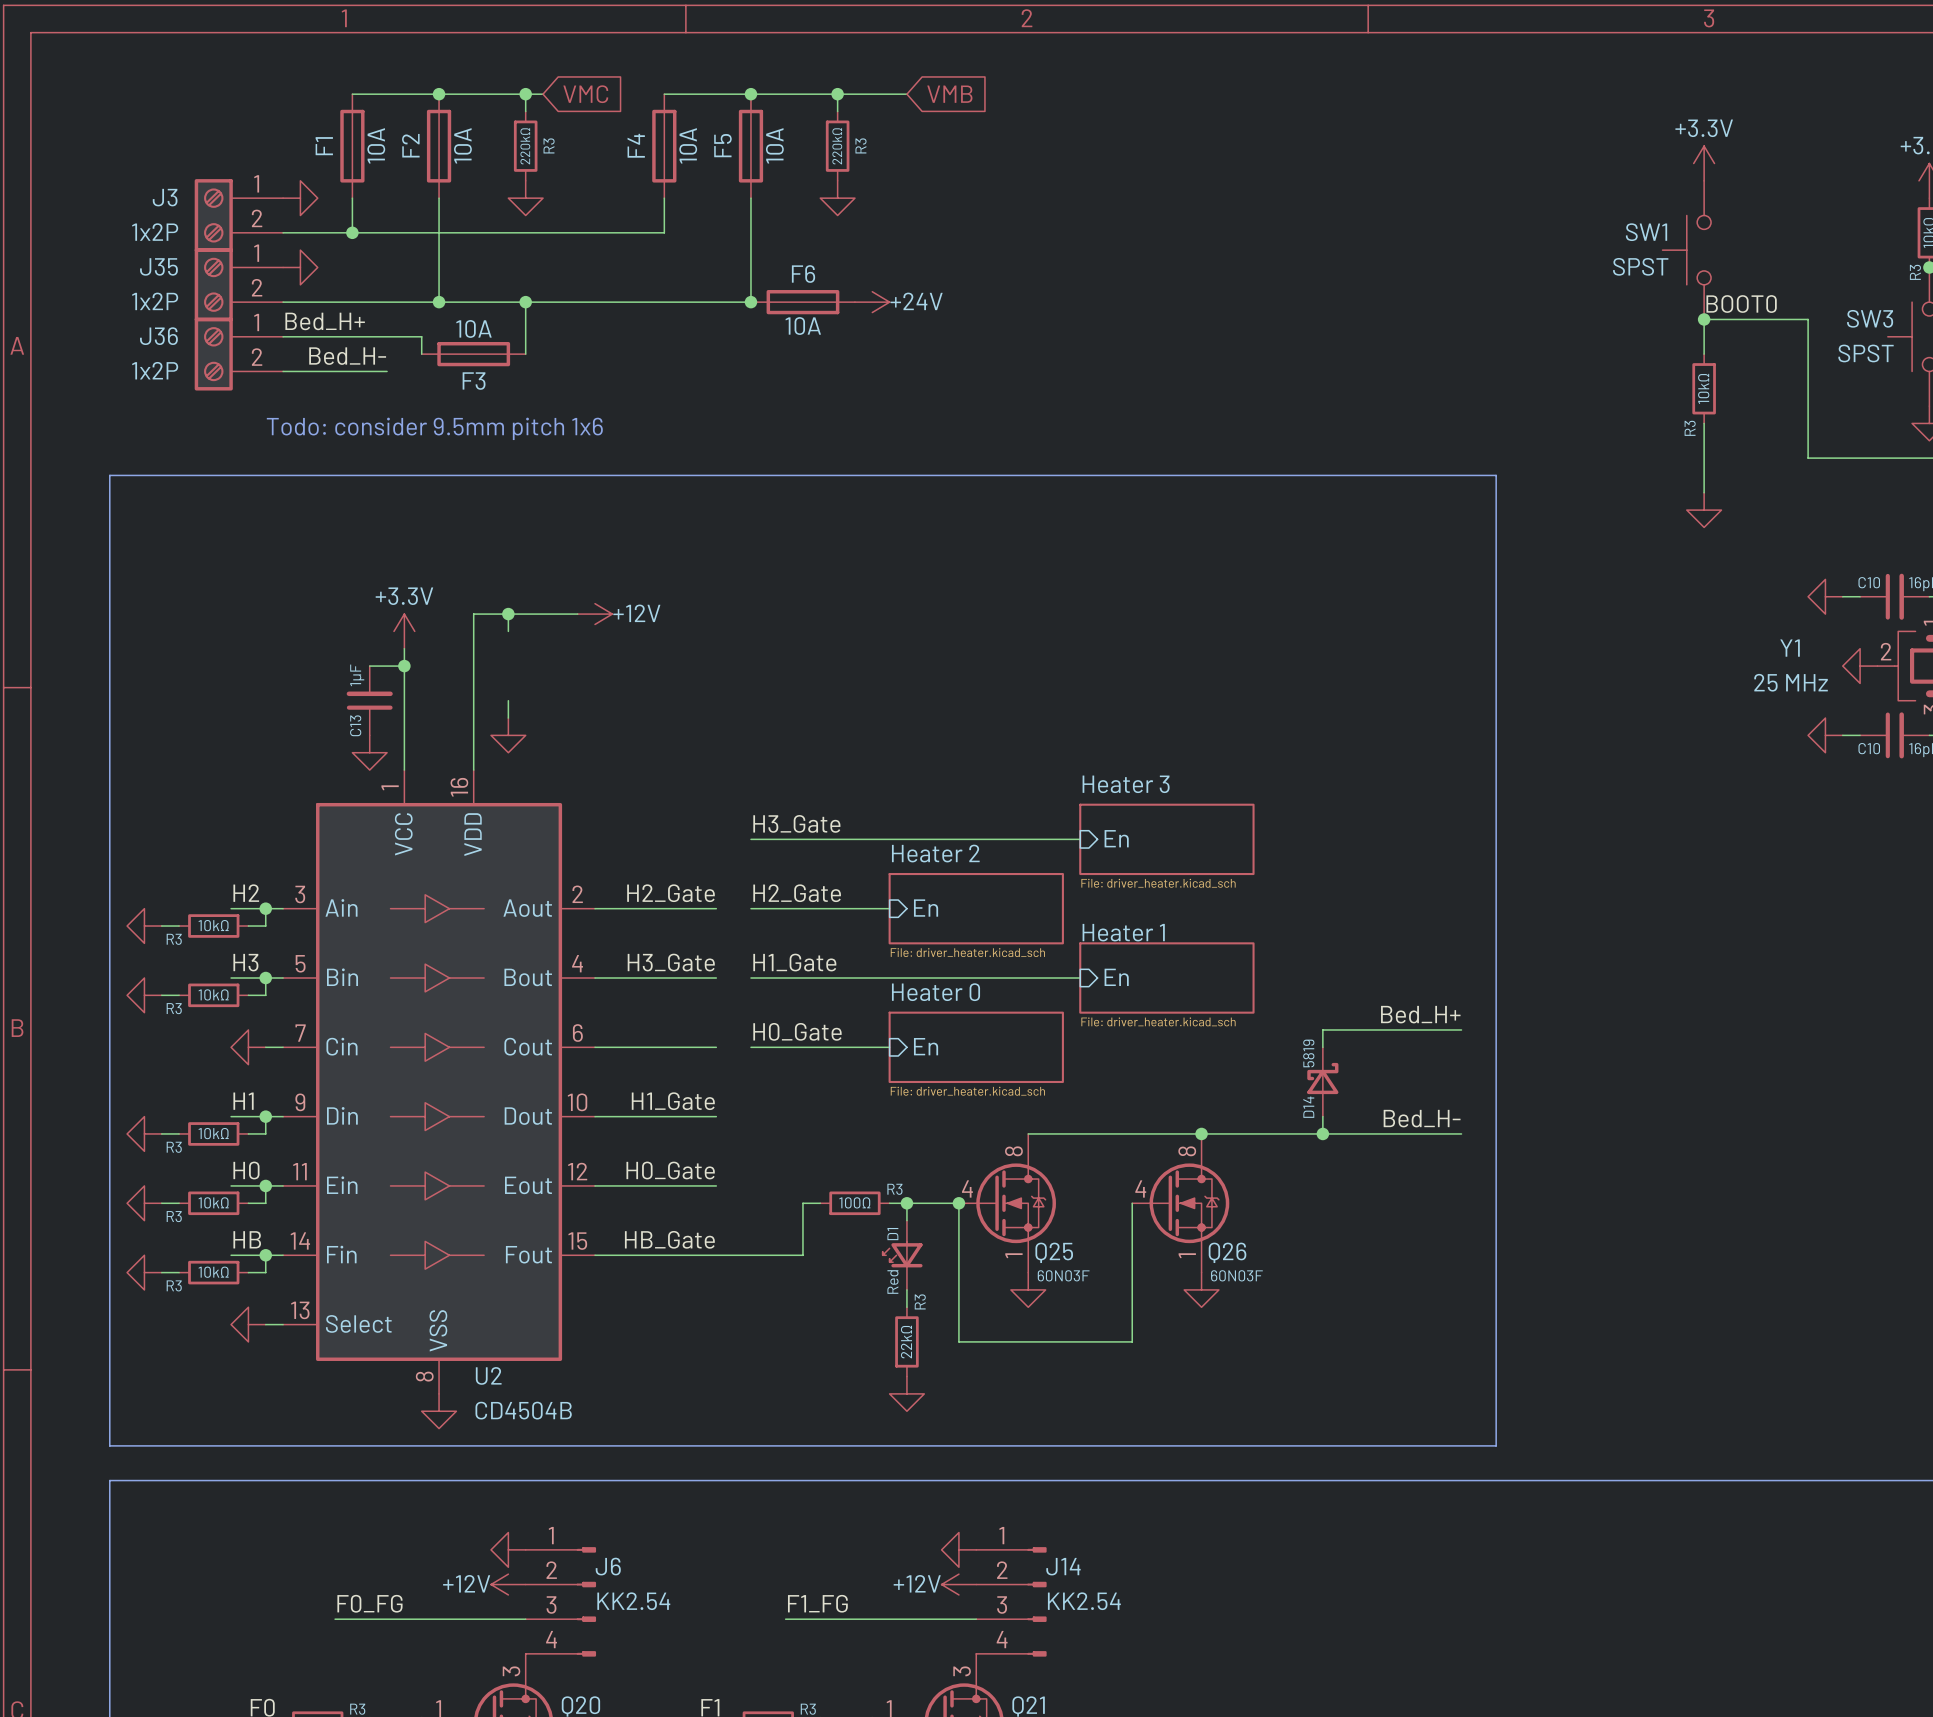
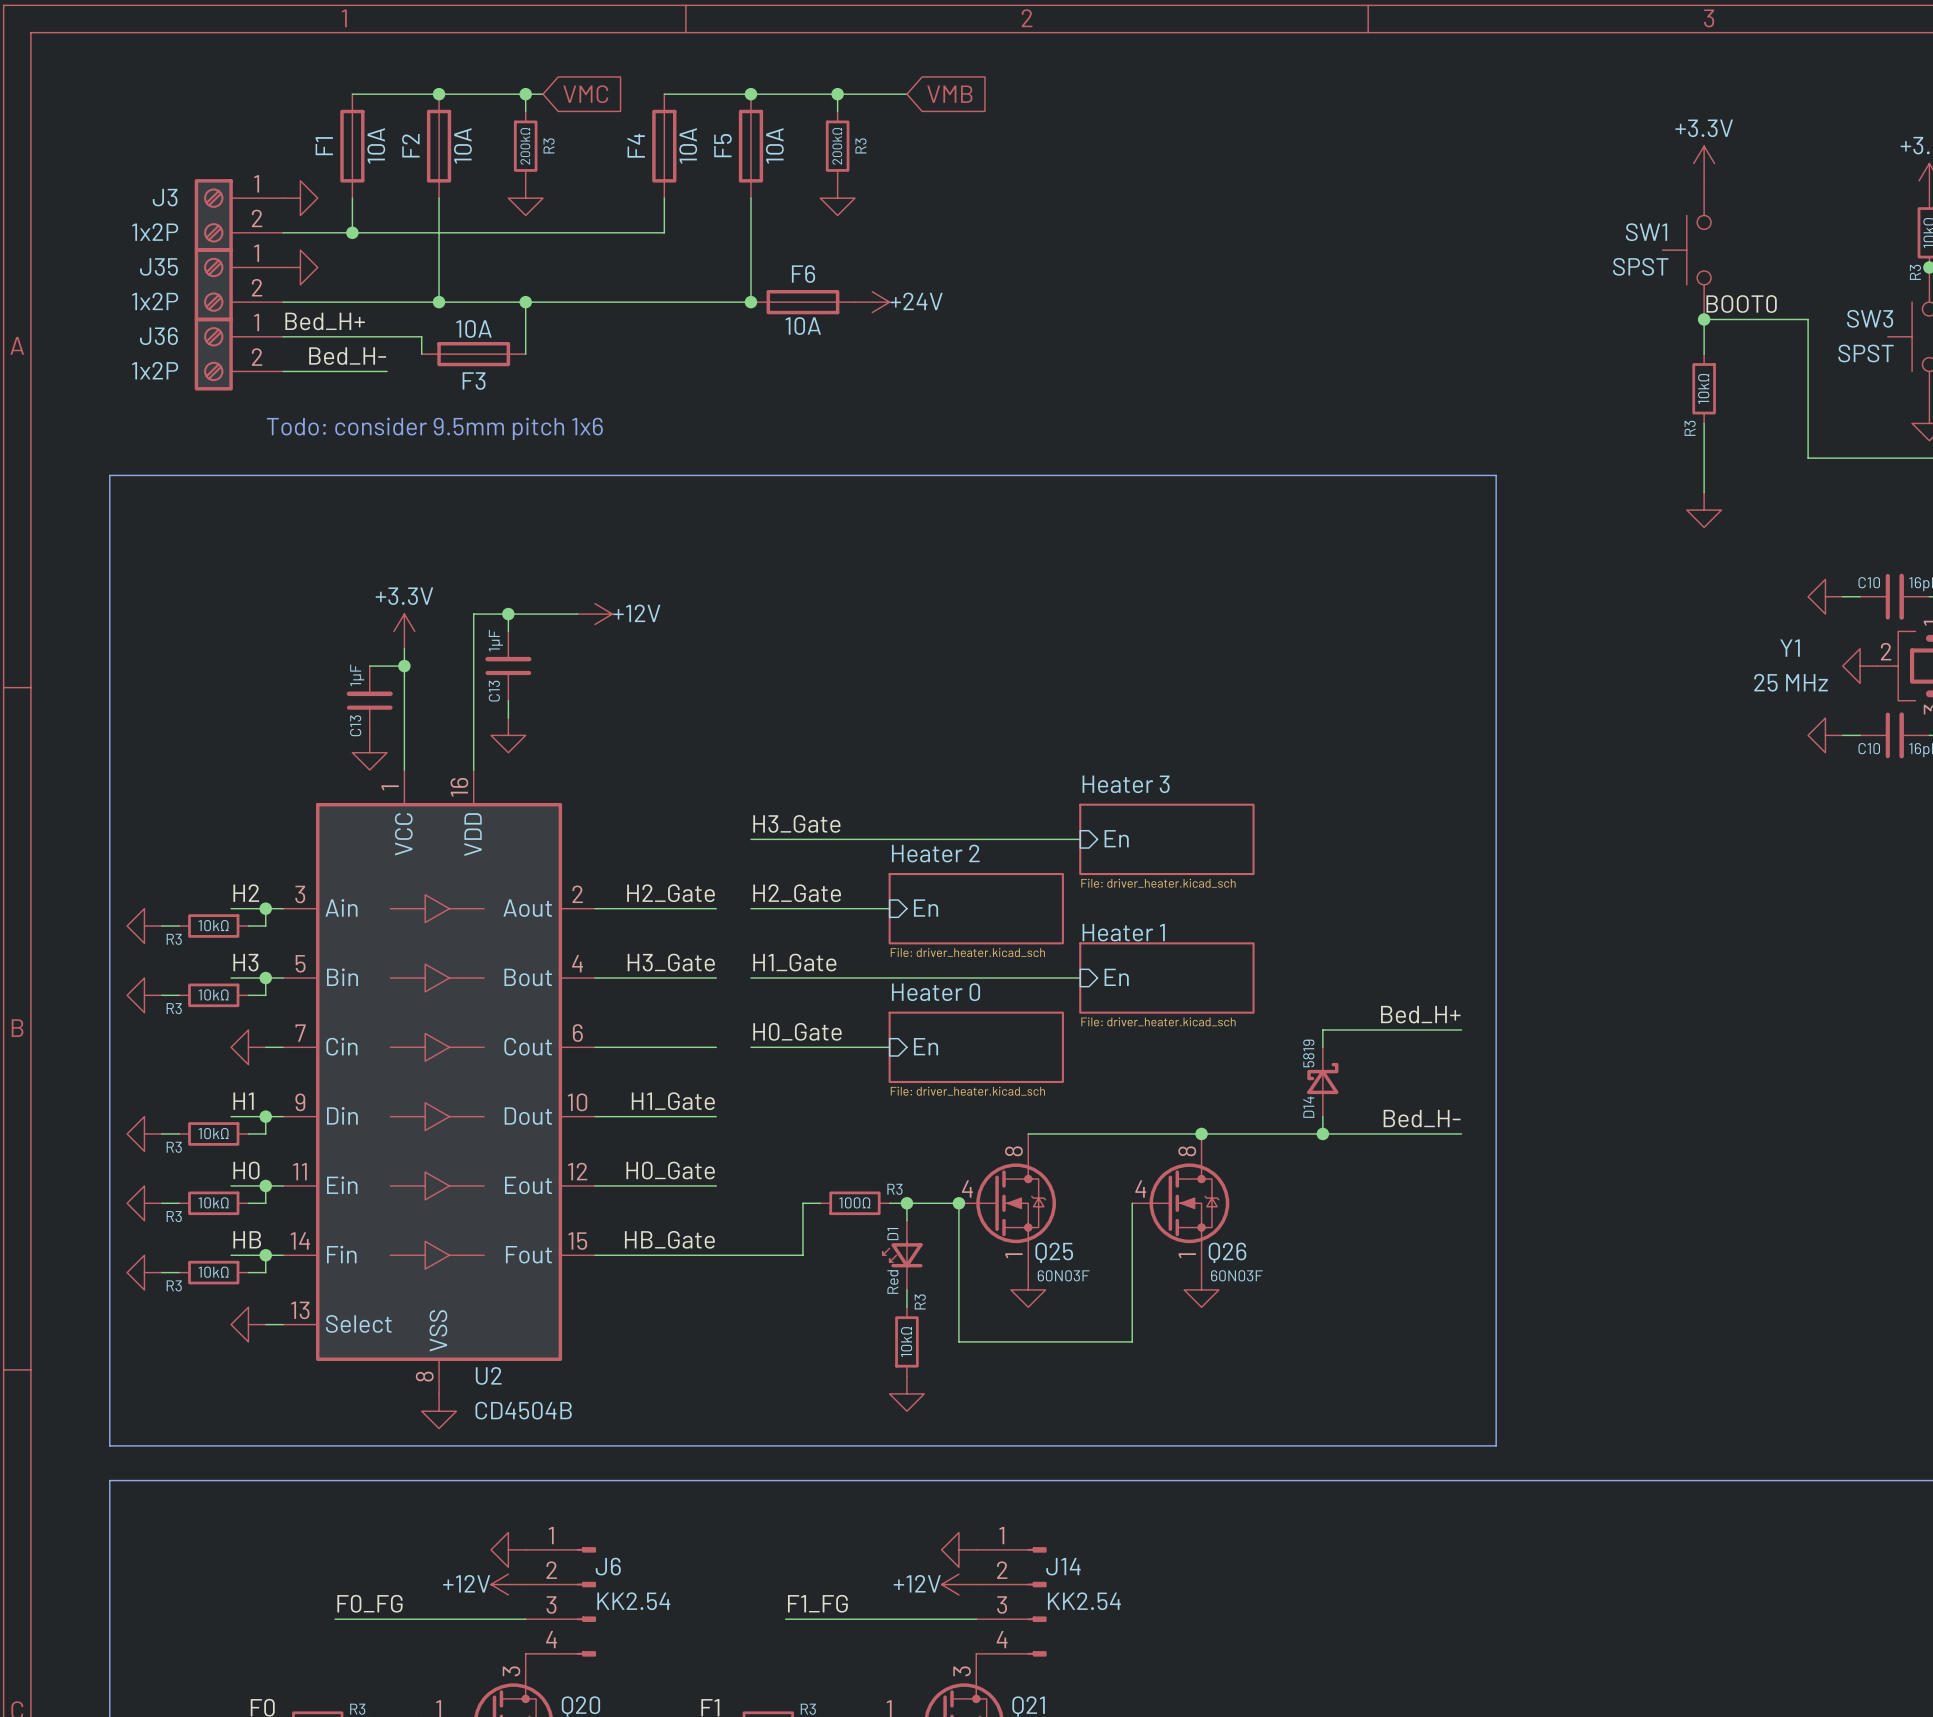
R3 value: 220kΩ (525, 146) -> 200kΩ (525, 146)
R3 value: 220kΩ (837, 146) -> 200kΩ (837, 146)
C13: none -> 1μF (508, 666)
R3 value: 22kΩ (906, 1342) -> 10kΩ (906, 1342)

